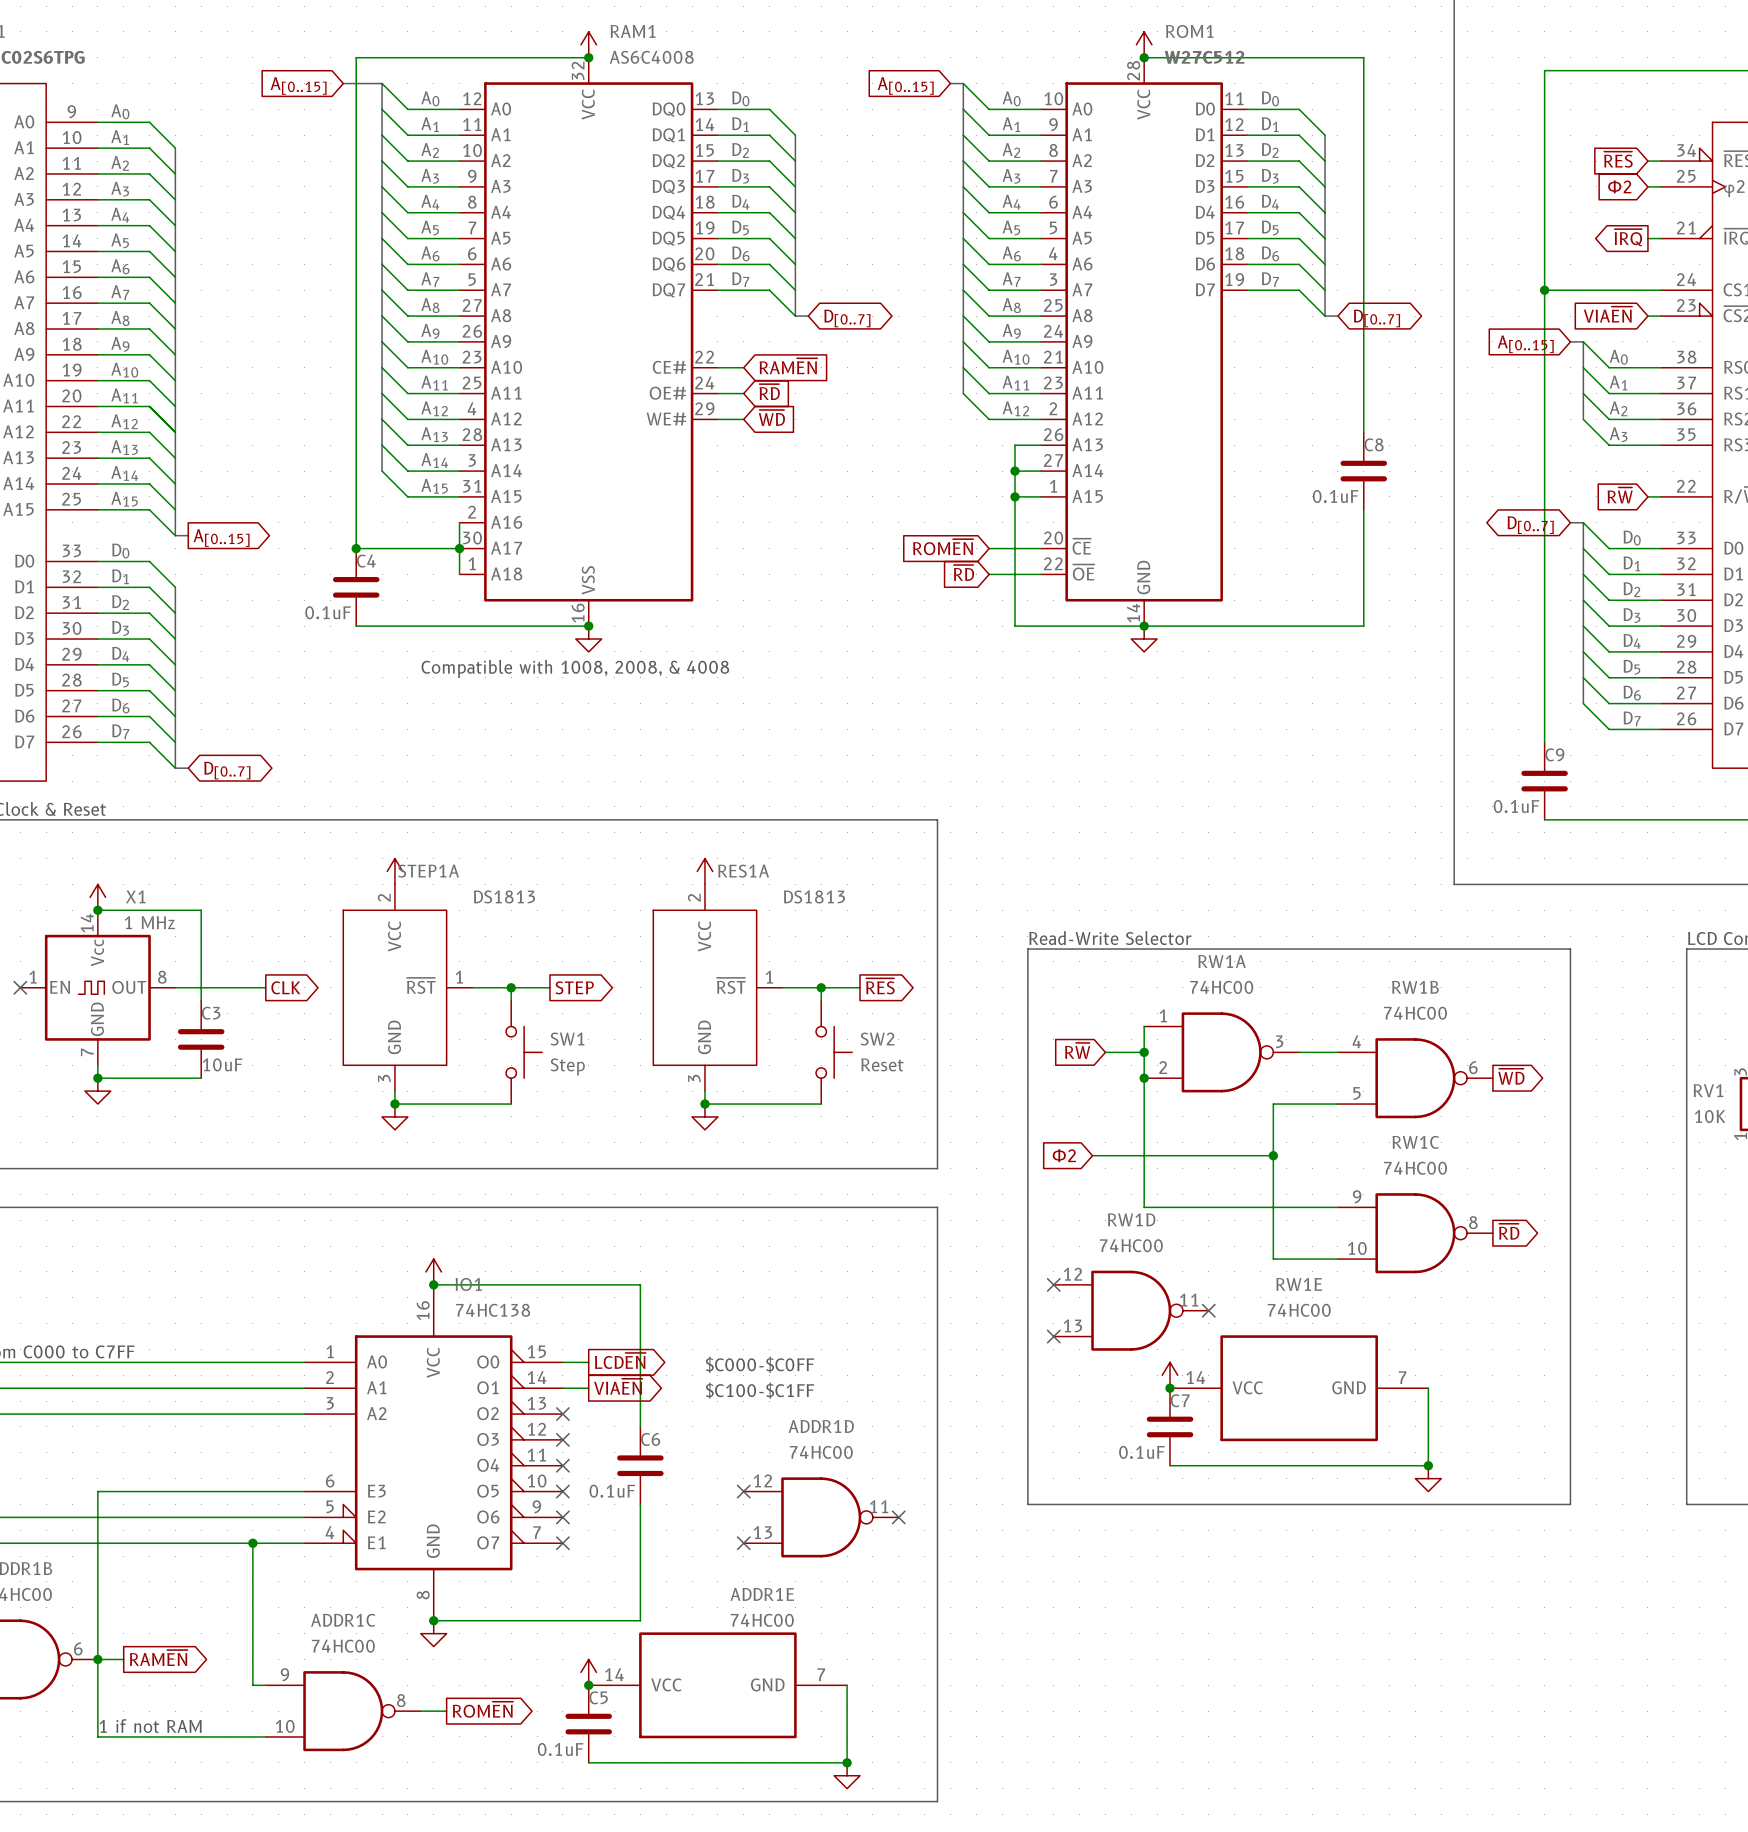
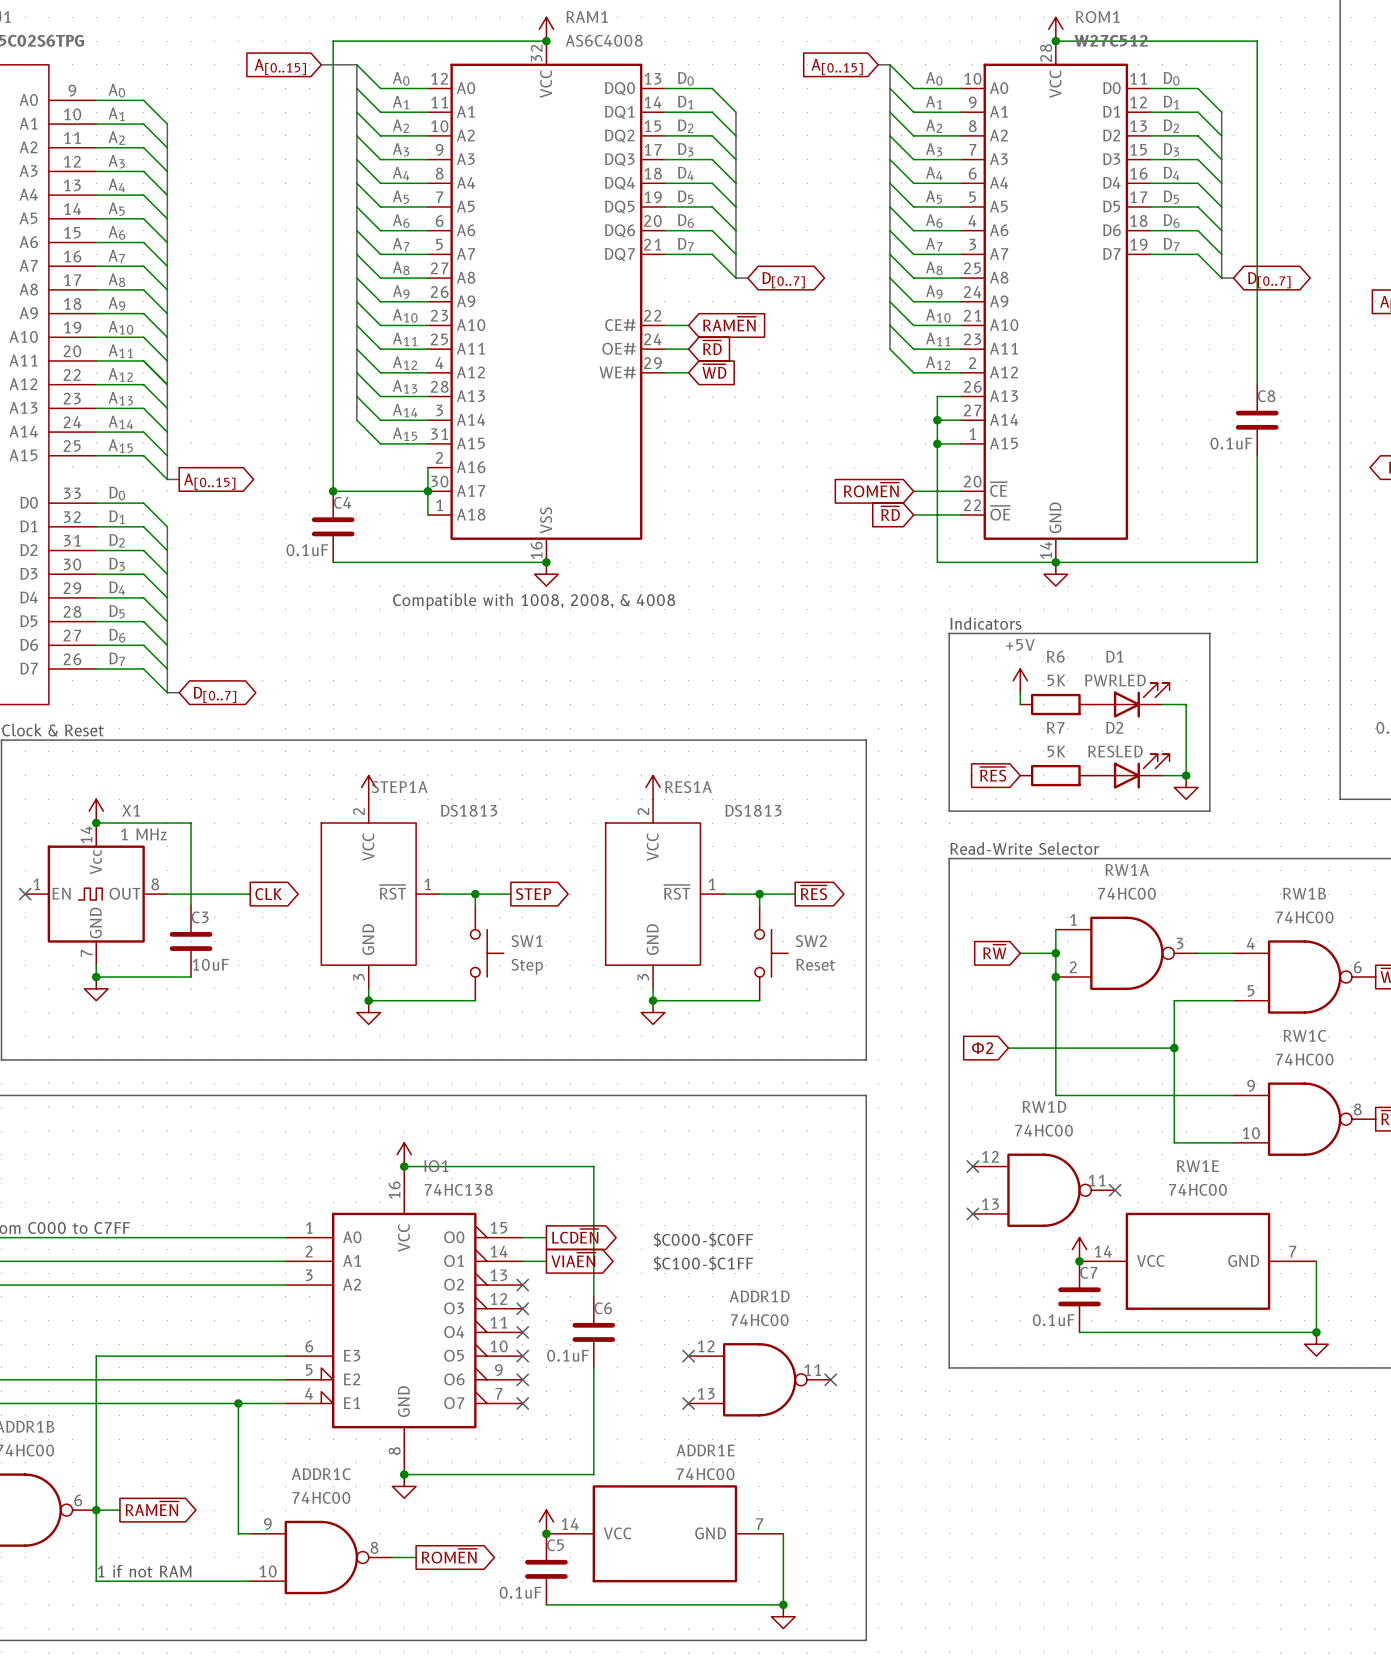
text: none -> Indicators (985, 623)
line: none -> (949, 633) (1209, 633) (1209, 811) (949, 811) (949, 633)
power symbol: none -> +5V (1020, 680)
wire: none -> (1020, 692) (1020, 704)
D1: none -> PWRLED (1130, 700)
R6: none -> 5K (1055, 704)
wire: none -> (1162, 704) (1186, 704) (1186, 775) (1162, 775)
D2: none -> RESLED (1130, 771)
global label: none -> ~{RES} (993, 774)
R7: none -> 5K (1055, 775)
junction: none -> (1186, 775)
power symbol: none -> (1186, 787)

